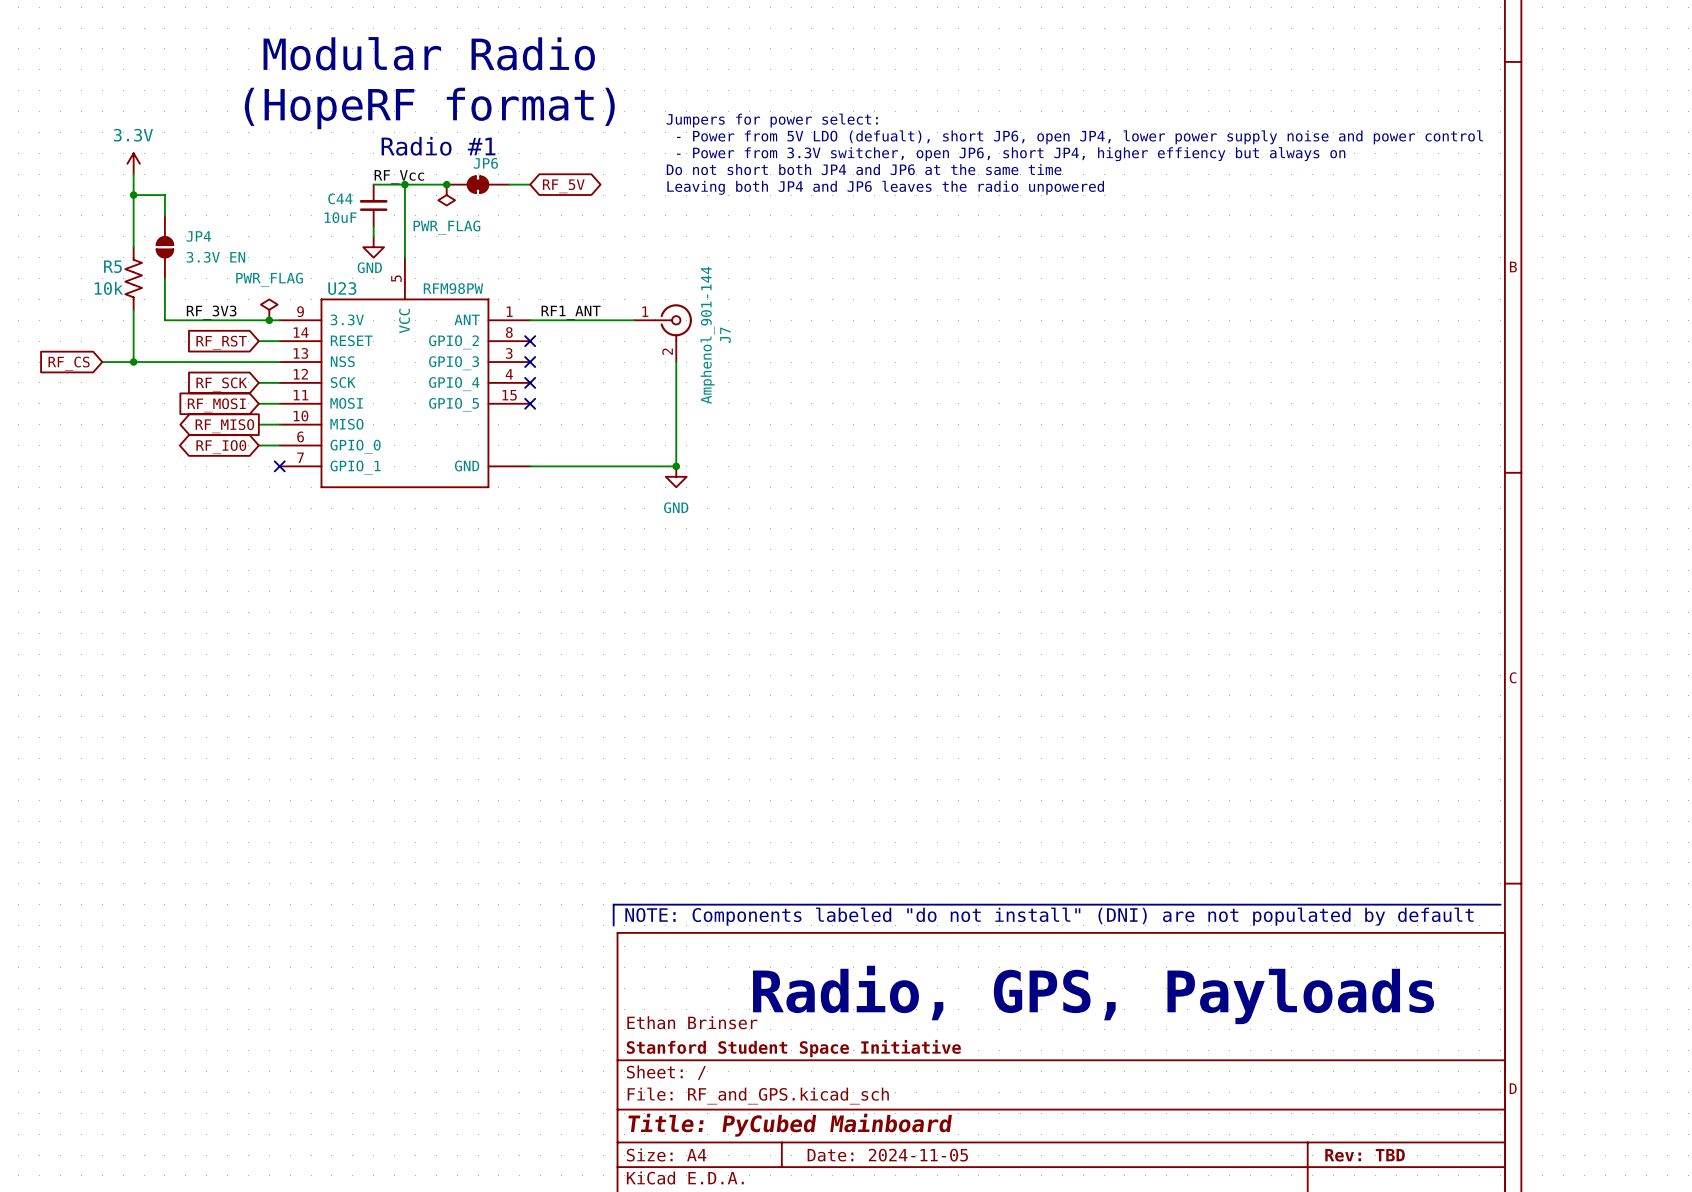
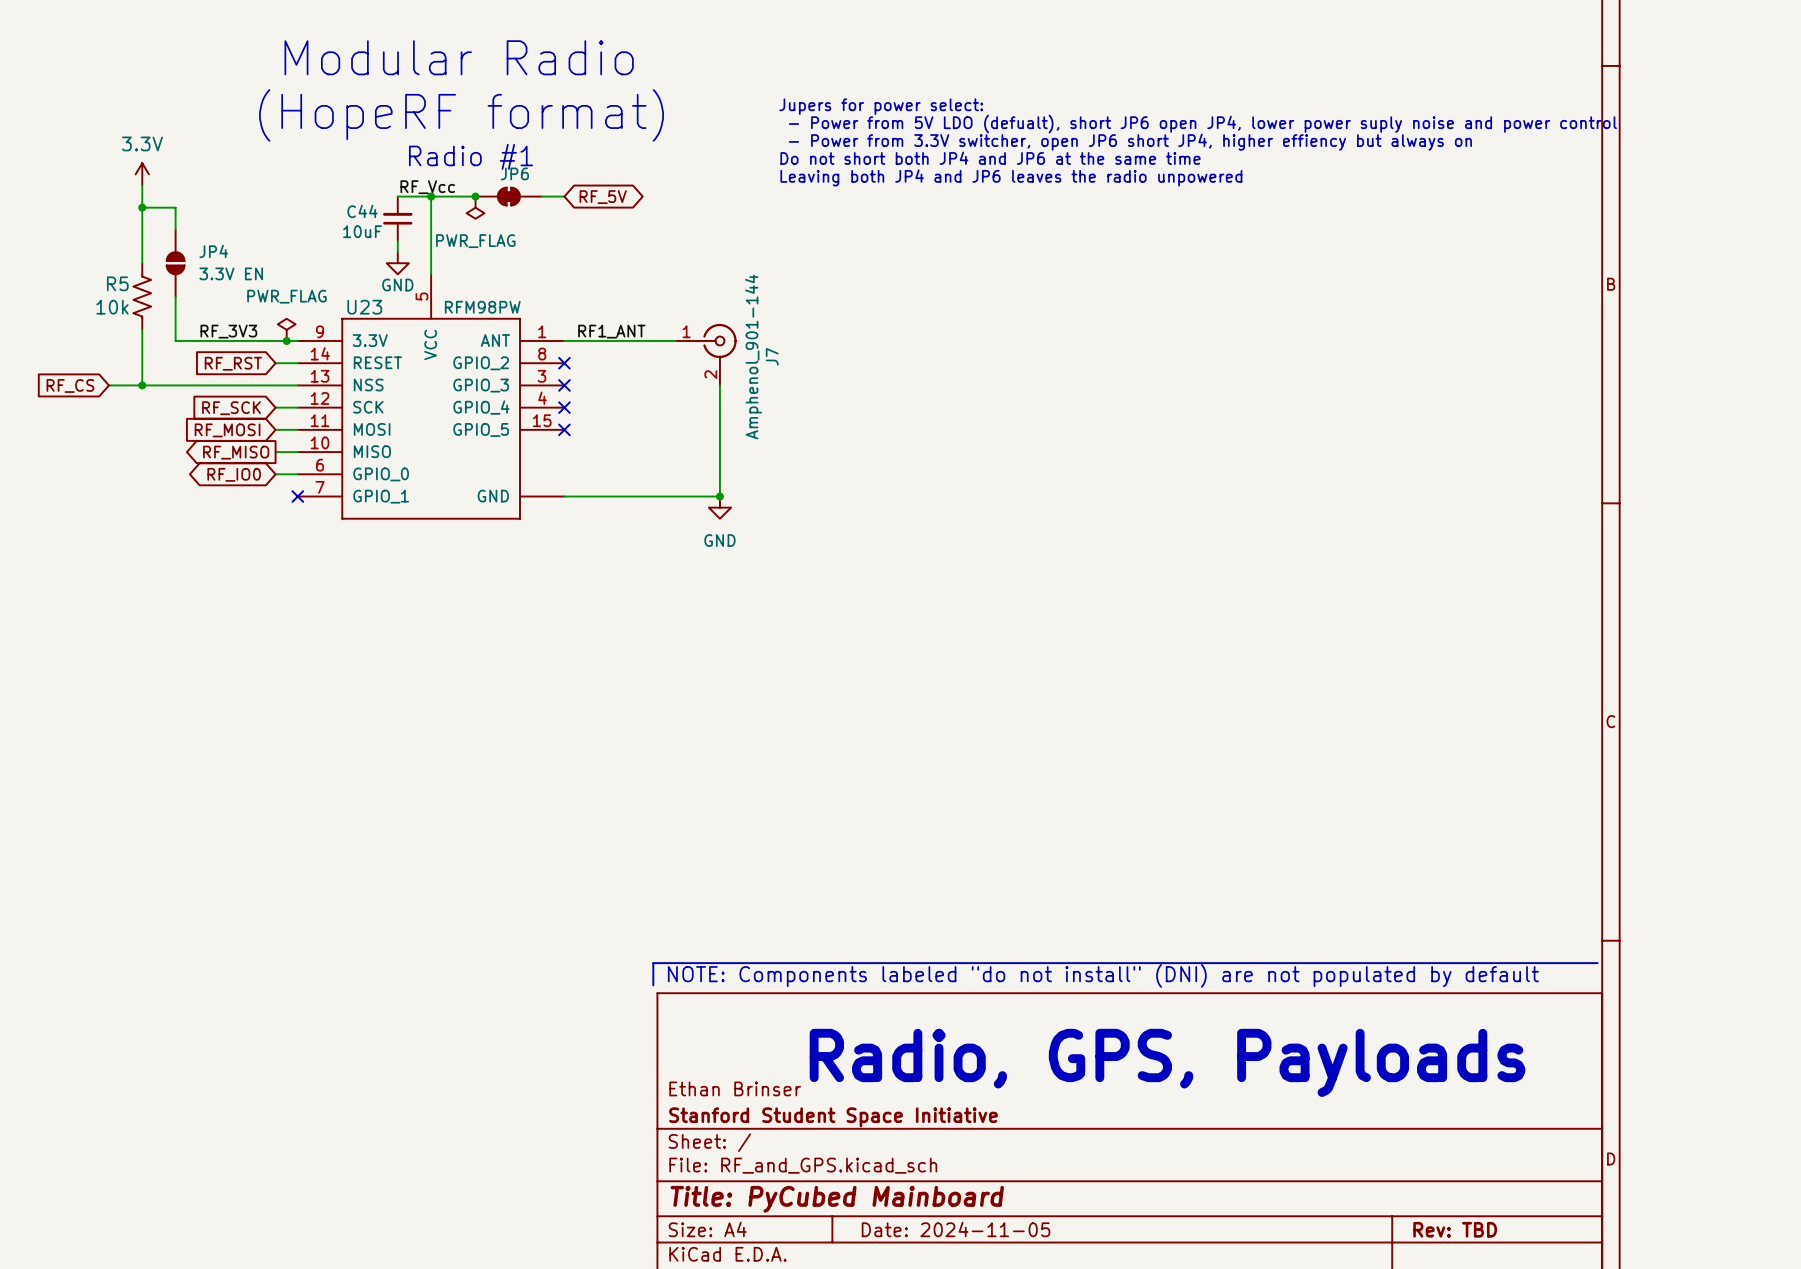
text: Jumpers for power select: (772, 120) -> Jupers for power select: (881, 106)
text: - Power from 5V LDO (defualt), short JP6, open JP4, lower power supply noise and power control (1080, 137) -> - Power from 5V LDO (defualt), short JP6 open JP4, lower power suply noise and power control (1202, 124)
text: - Power from 3.3V switcher, open JP6, short JP4, higher effiency but always on (1011, 154) -> - Power from 3.3V switcher, open JP6 short JP4, higher effiency but always on (1130, 142)
text position: Do not short both JP4 and JP6 at the same time (864, 169) -> Do not short both JP4 and JP6 at the same time (990, 158)
text position: Leaving both JP4 and JP6 leaves the radio unpowered (885, 187) -> Leaving both JP4 and JP6 leaves the radio unpowered (1011, 177)

